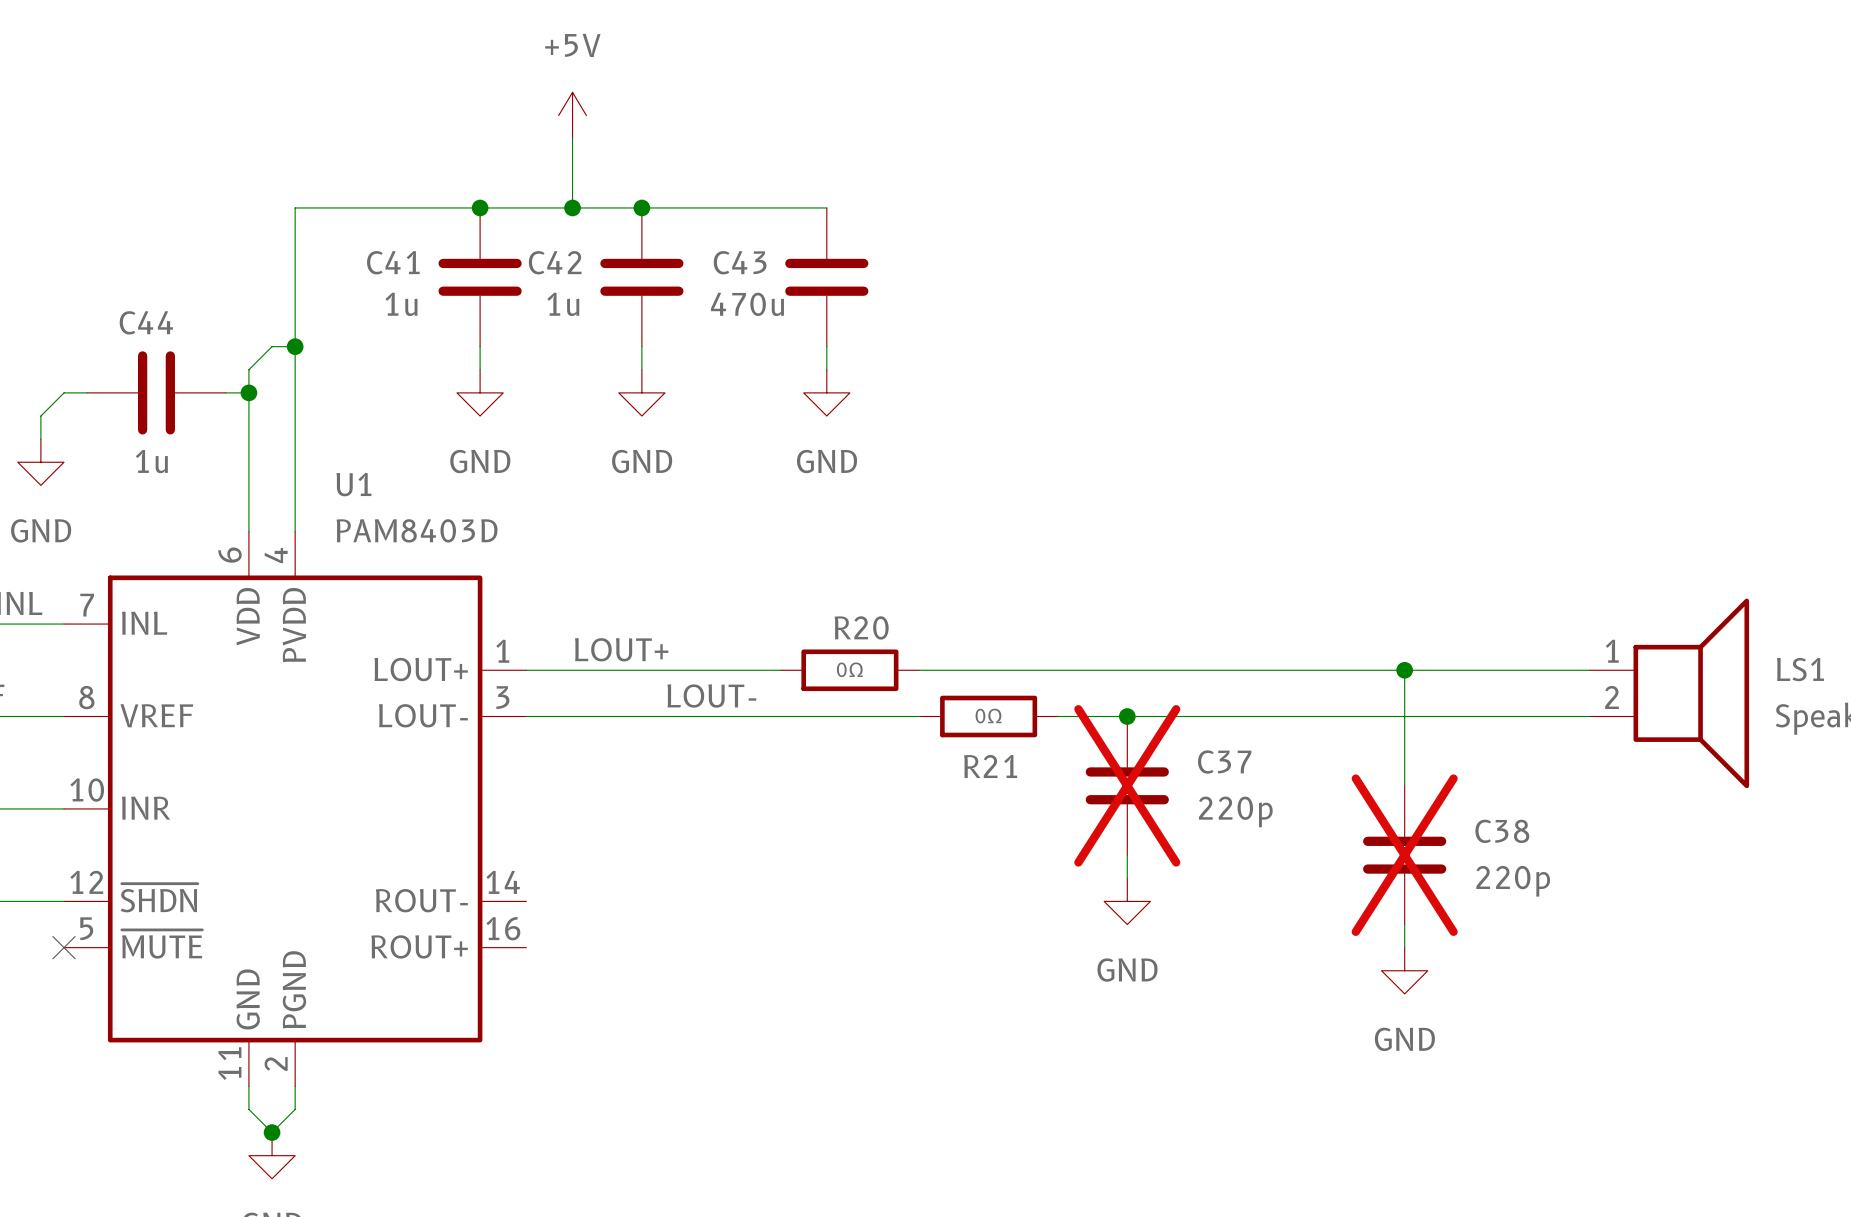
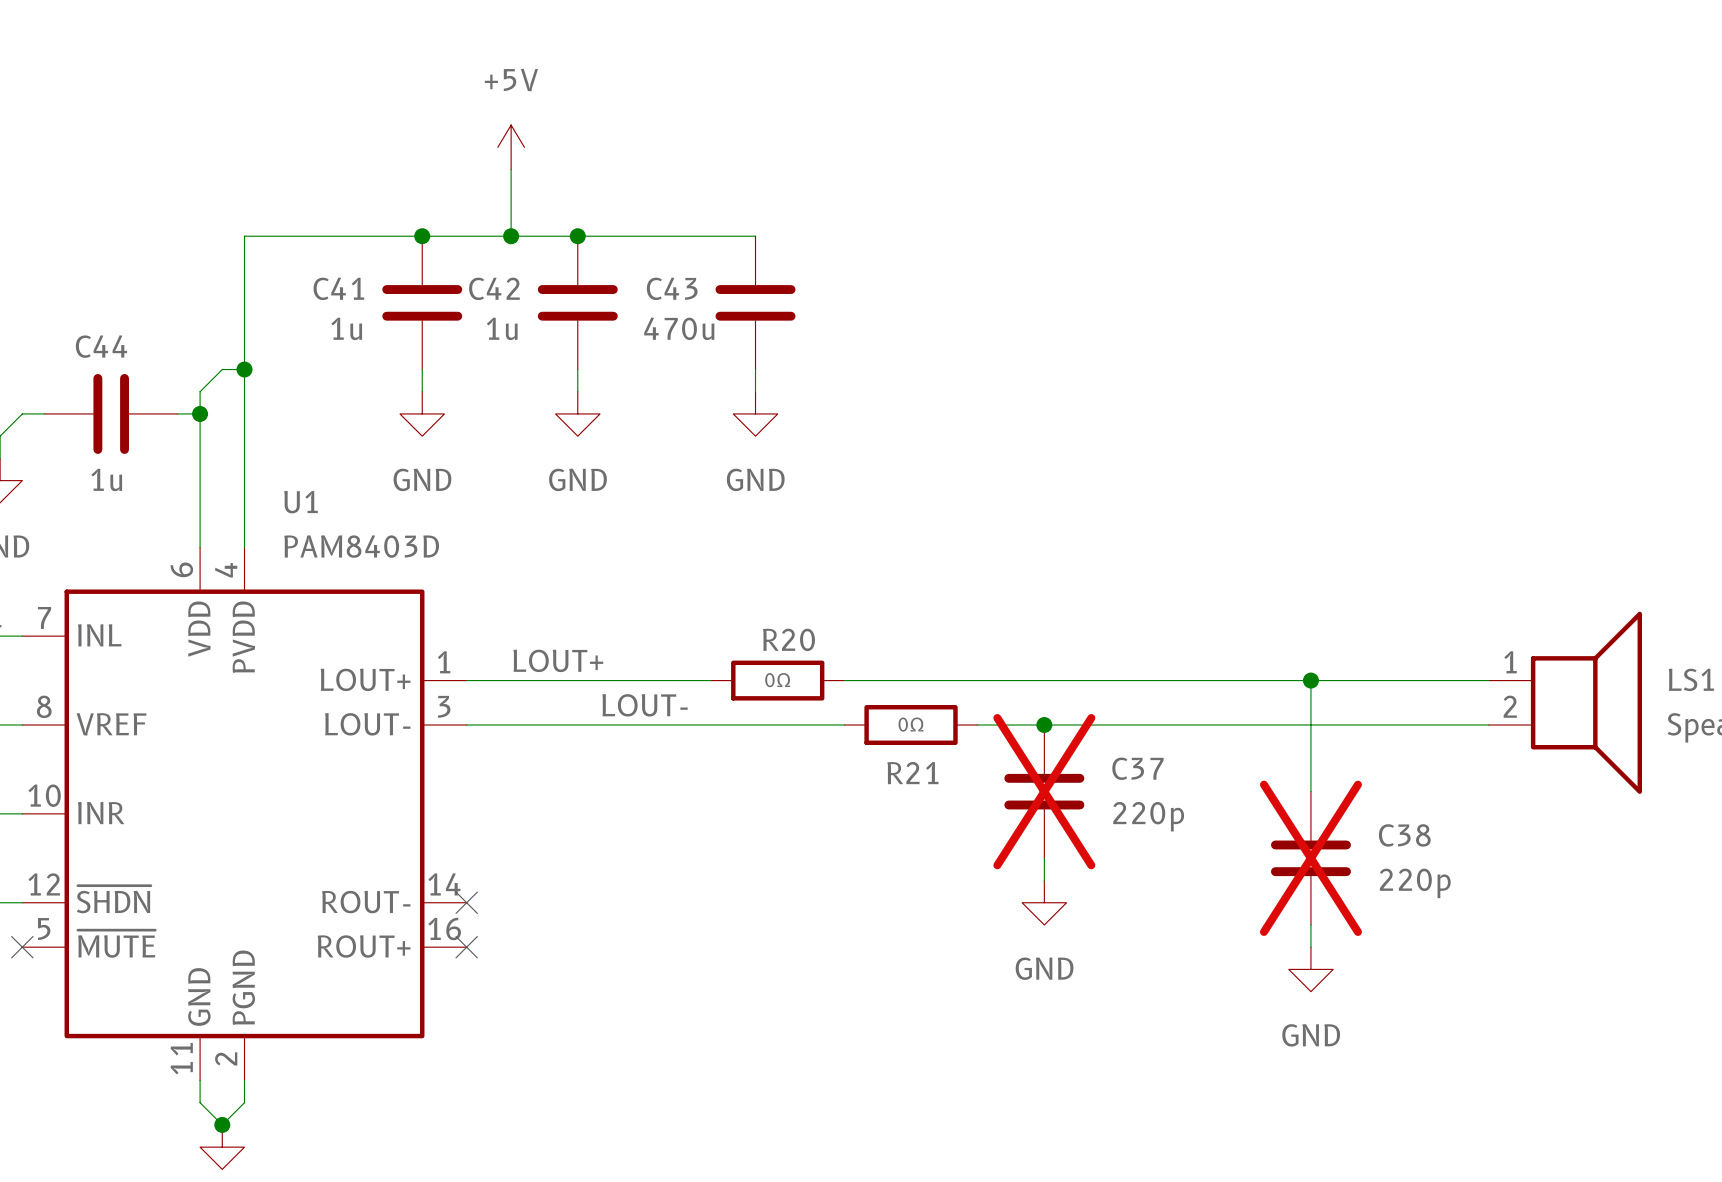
no-connect mark: none -> (466, 902)
no-connect mark: none -> (466, 947)

